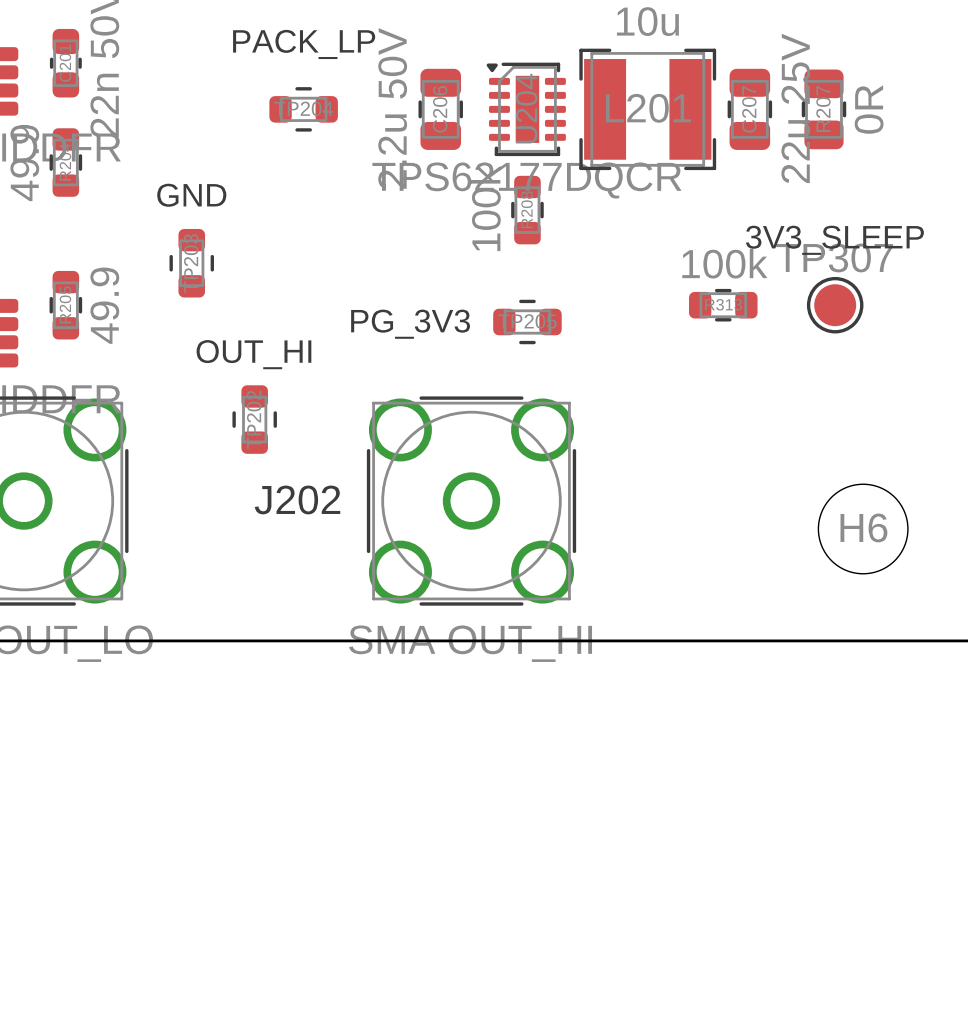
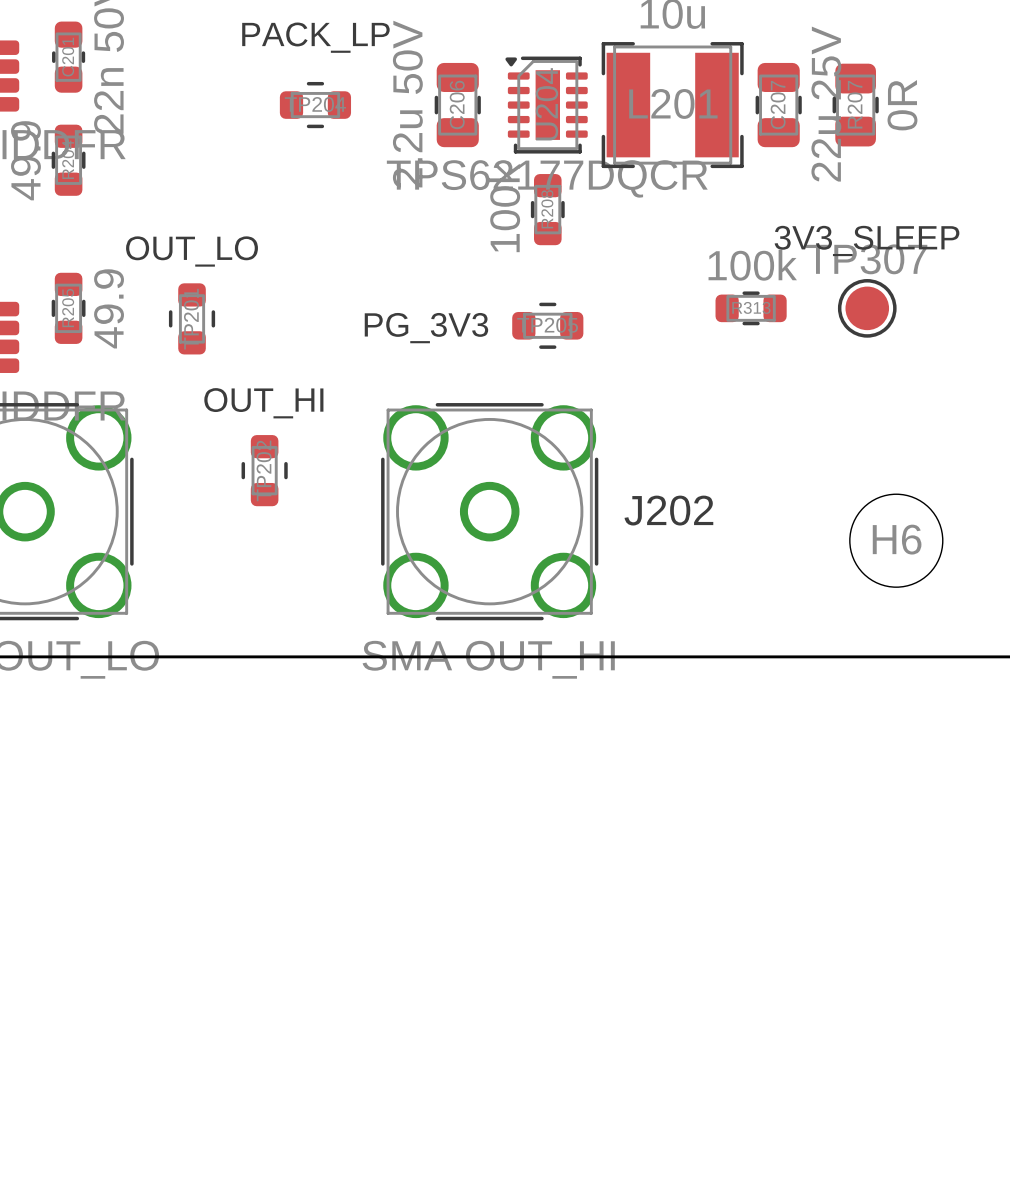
part: GND (191, 263) -> none
part: none -> OUT_LO (192, 318)
part position: (254, 419) -> (264, 470)
J202 name position: J202 (297, 499) -> J202 (668, 510)

